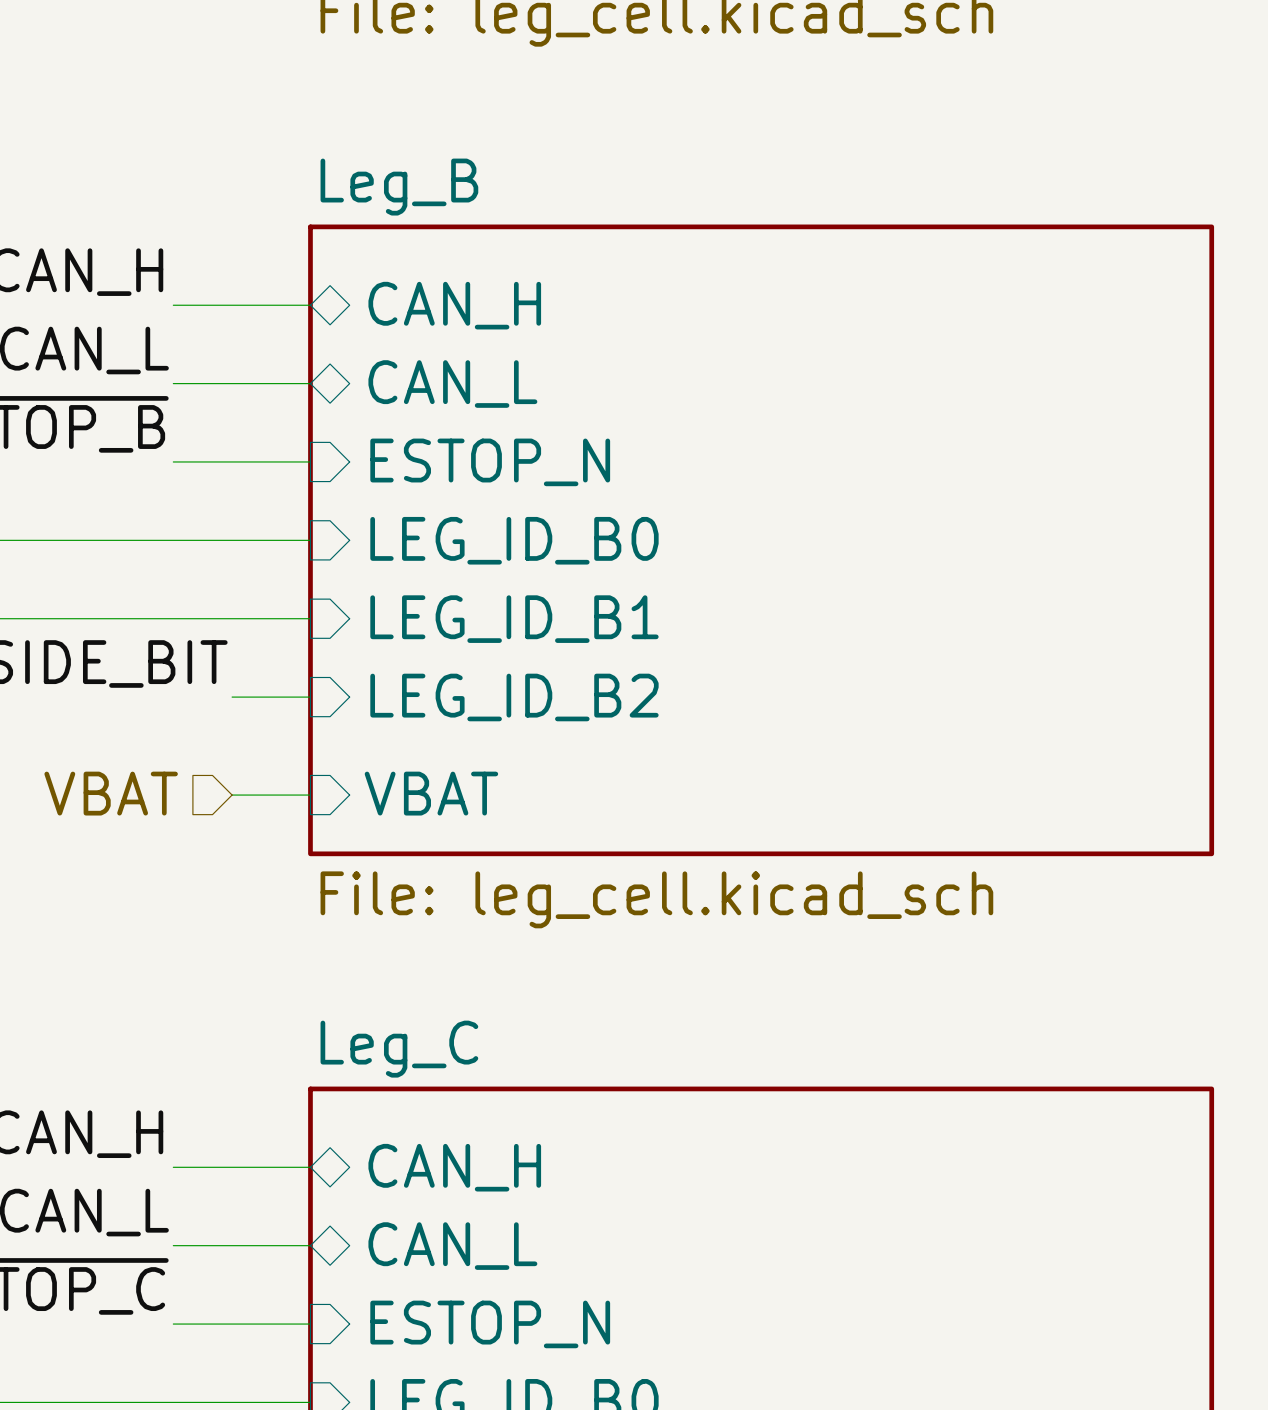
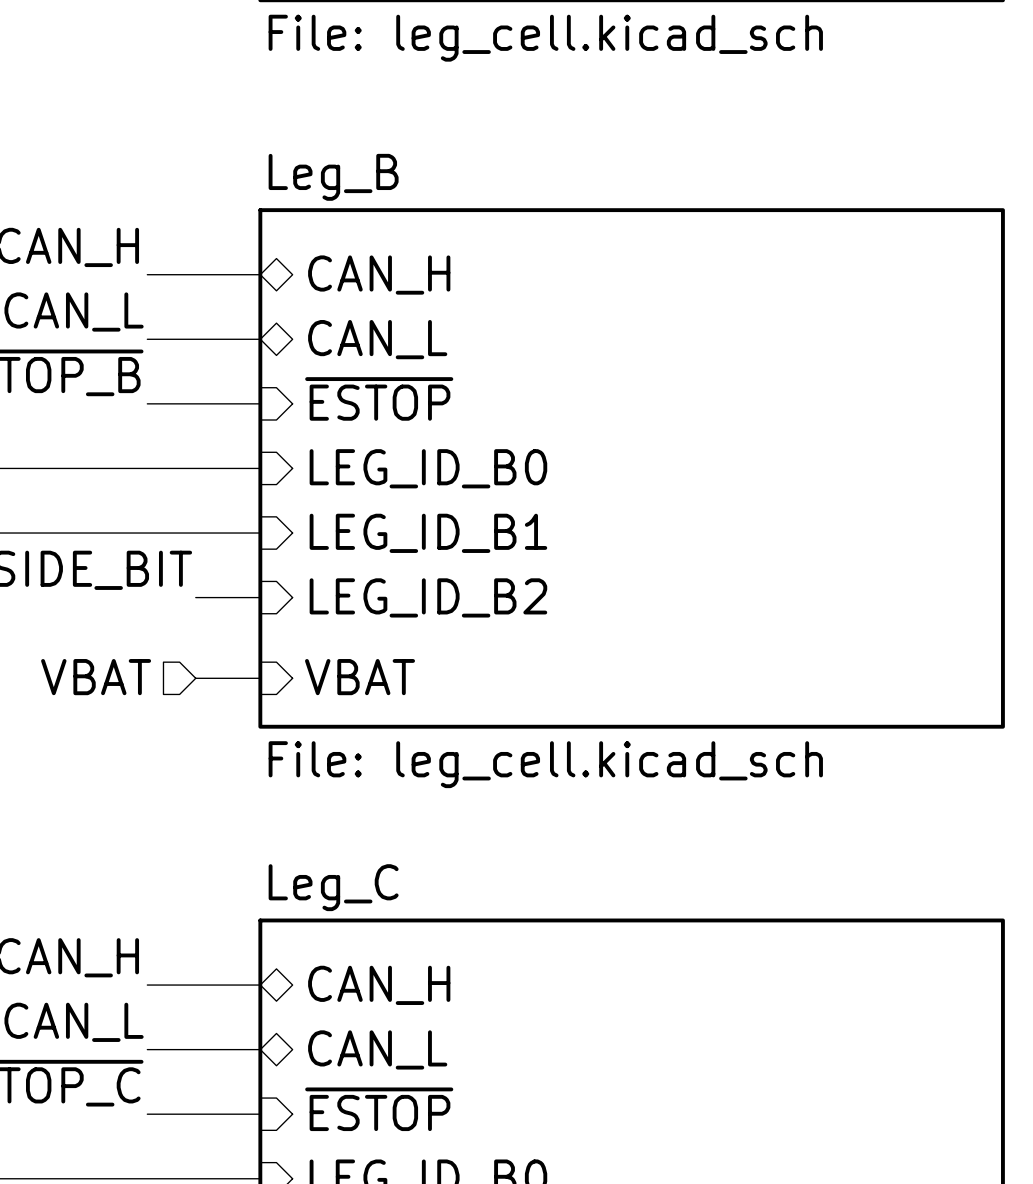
sheet pin: ESTOP_N (490, 462) -> ~{ESTOP} (379, 398)
sheet pin: ESTOP_N (490, 1324) -> ~{ESTOP} (379, 1109)

